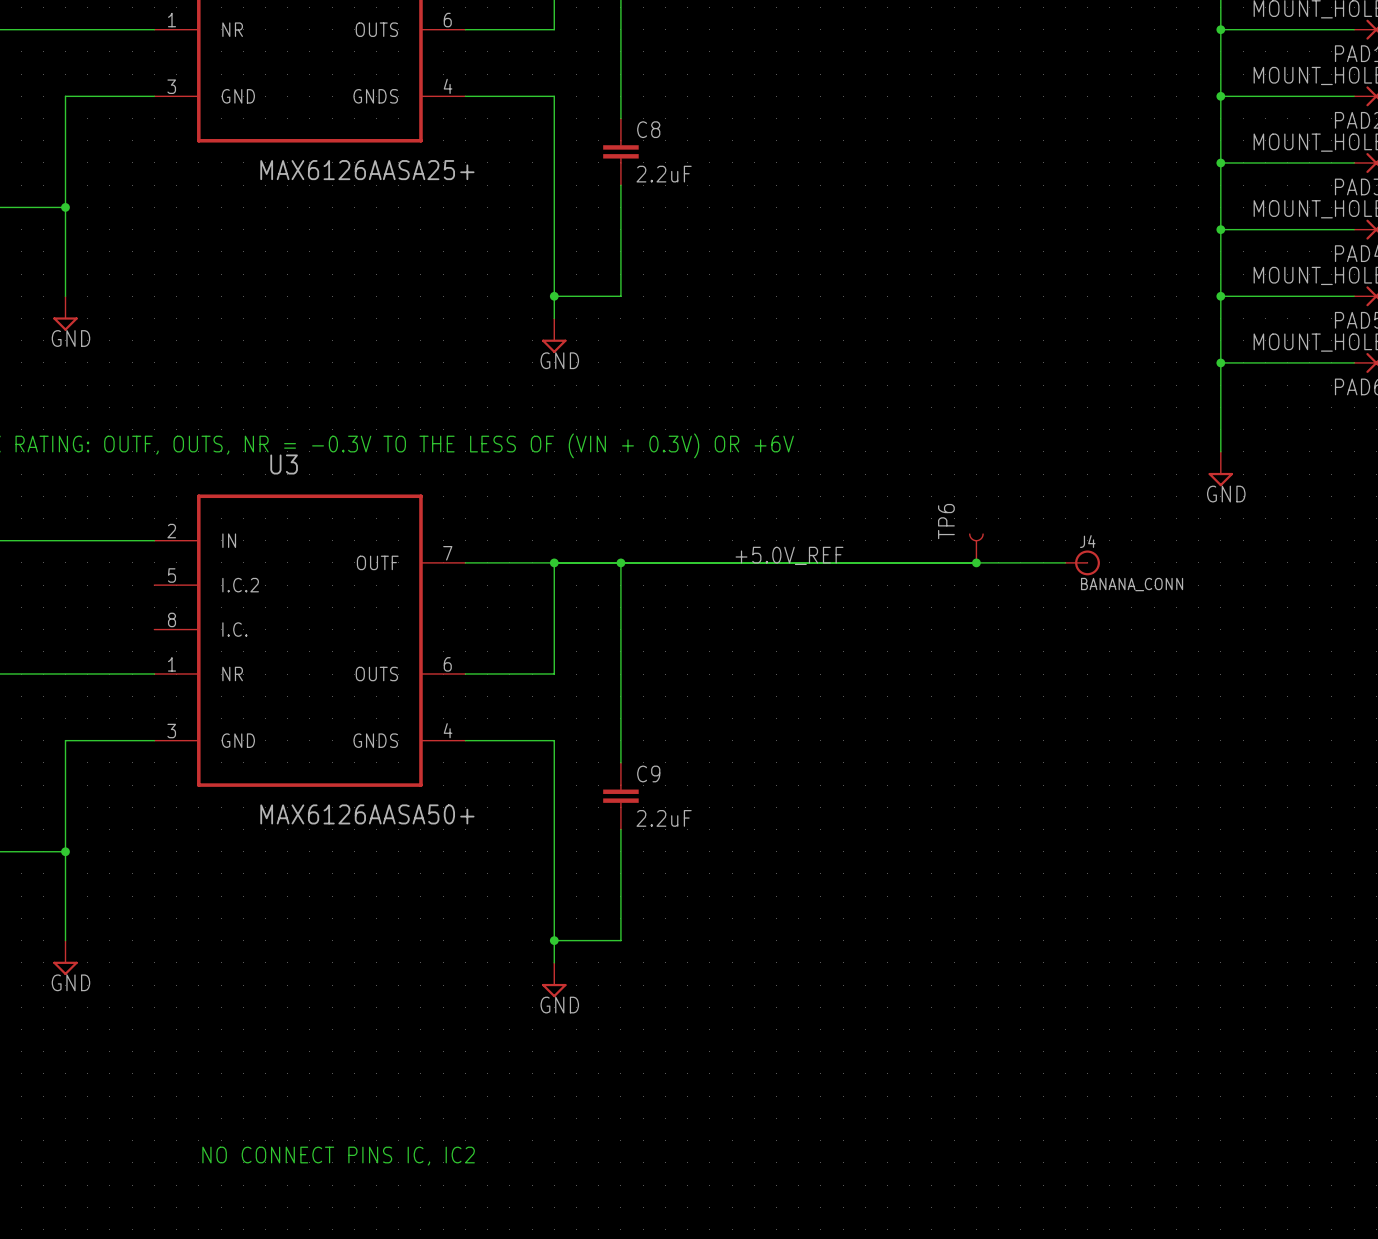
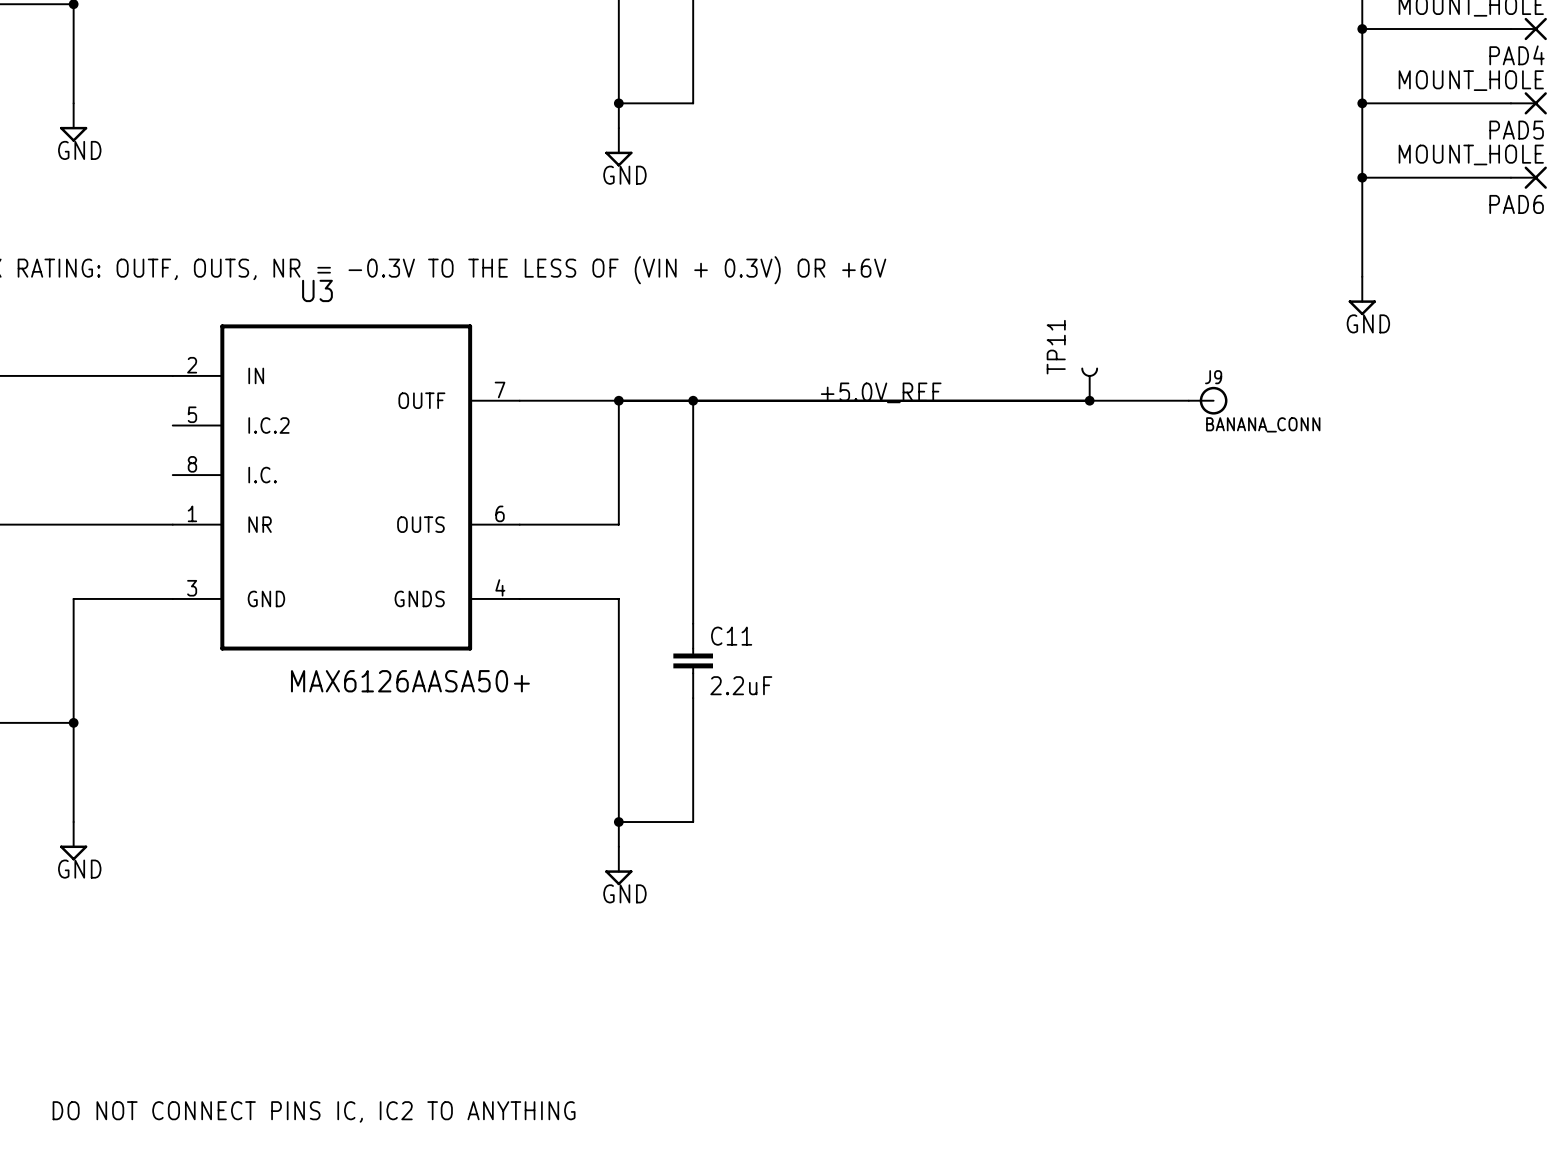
TP6 name: TP6 (946, 521) -> TP11 (1056, 347)
J4 name: J4 (1087, 541) -> J9 (1213, 377)
C9 name: C9 (648, 773) -> C11 (731, 636)
text: NO CONNECT PINS IC, IC2 (338, 1156) -> none
text: none -> DO NOT CONNECT PINS IC, IC2 TO ANYTHING (314, 1111)

